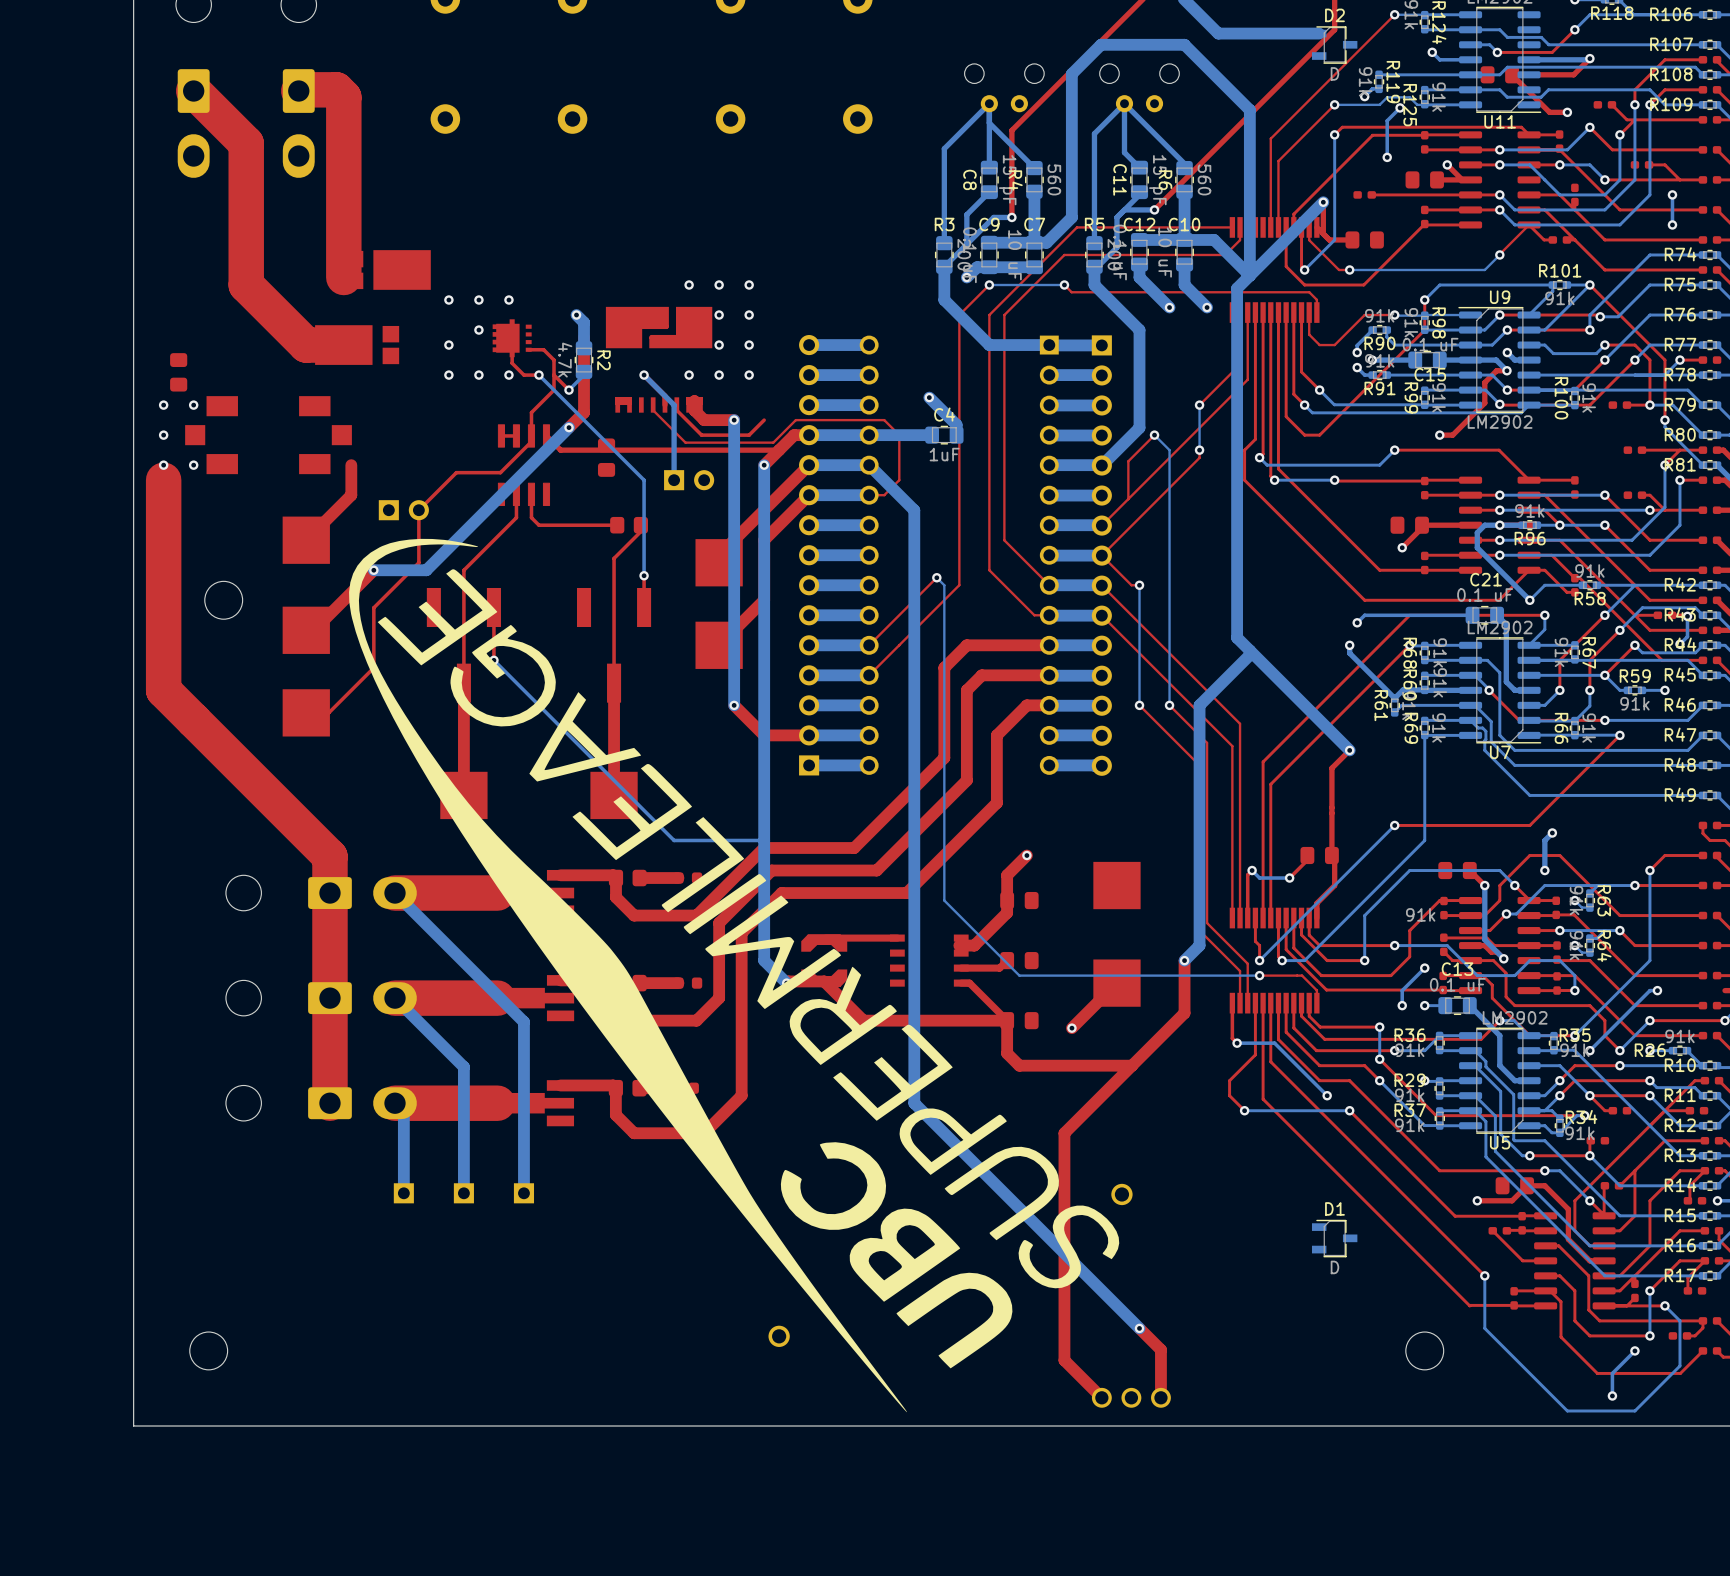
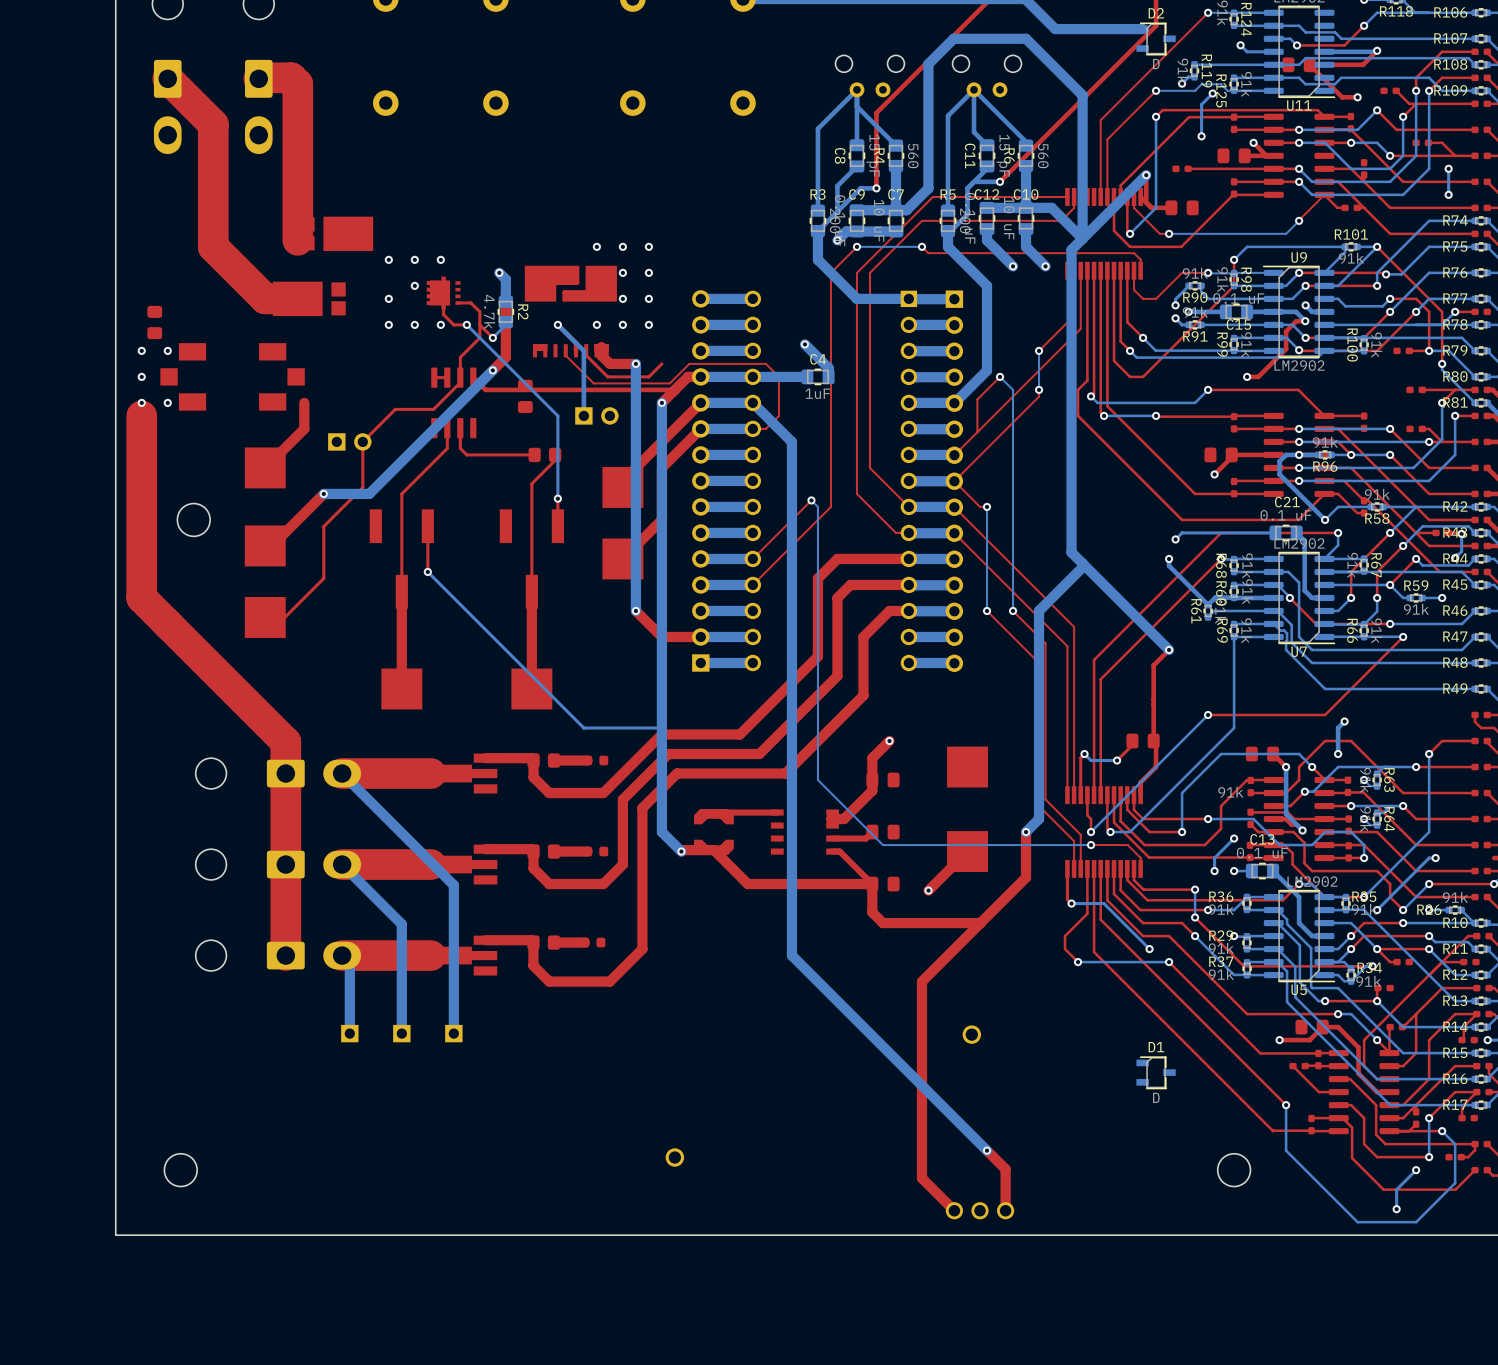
drawing: [349, 538, 1120, 1413] -> none

